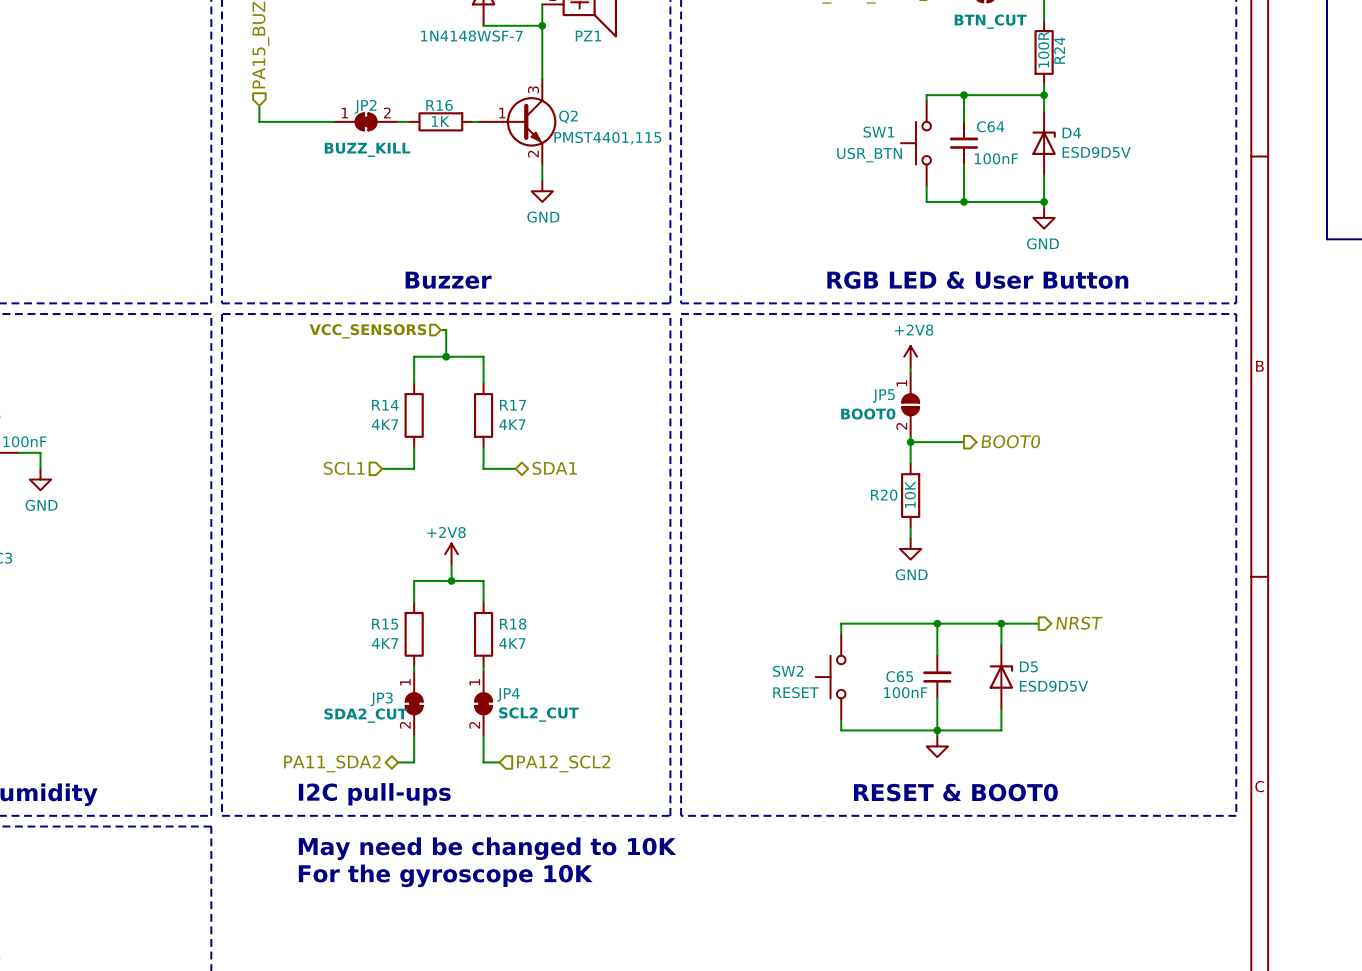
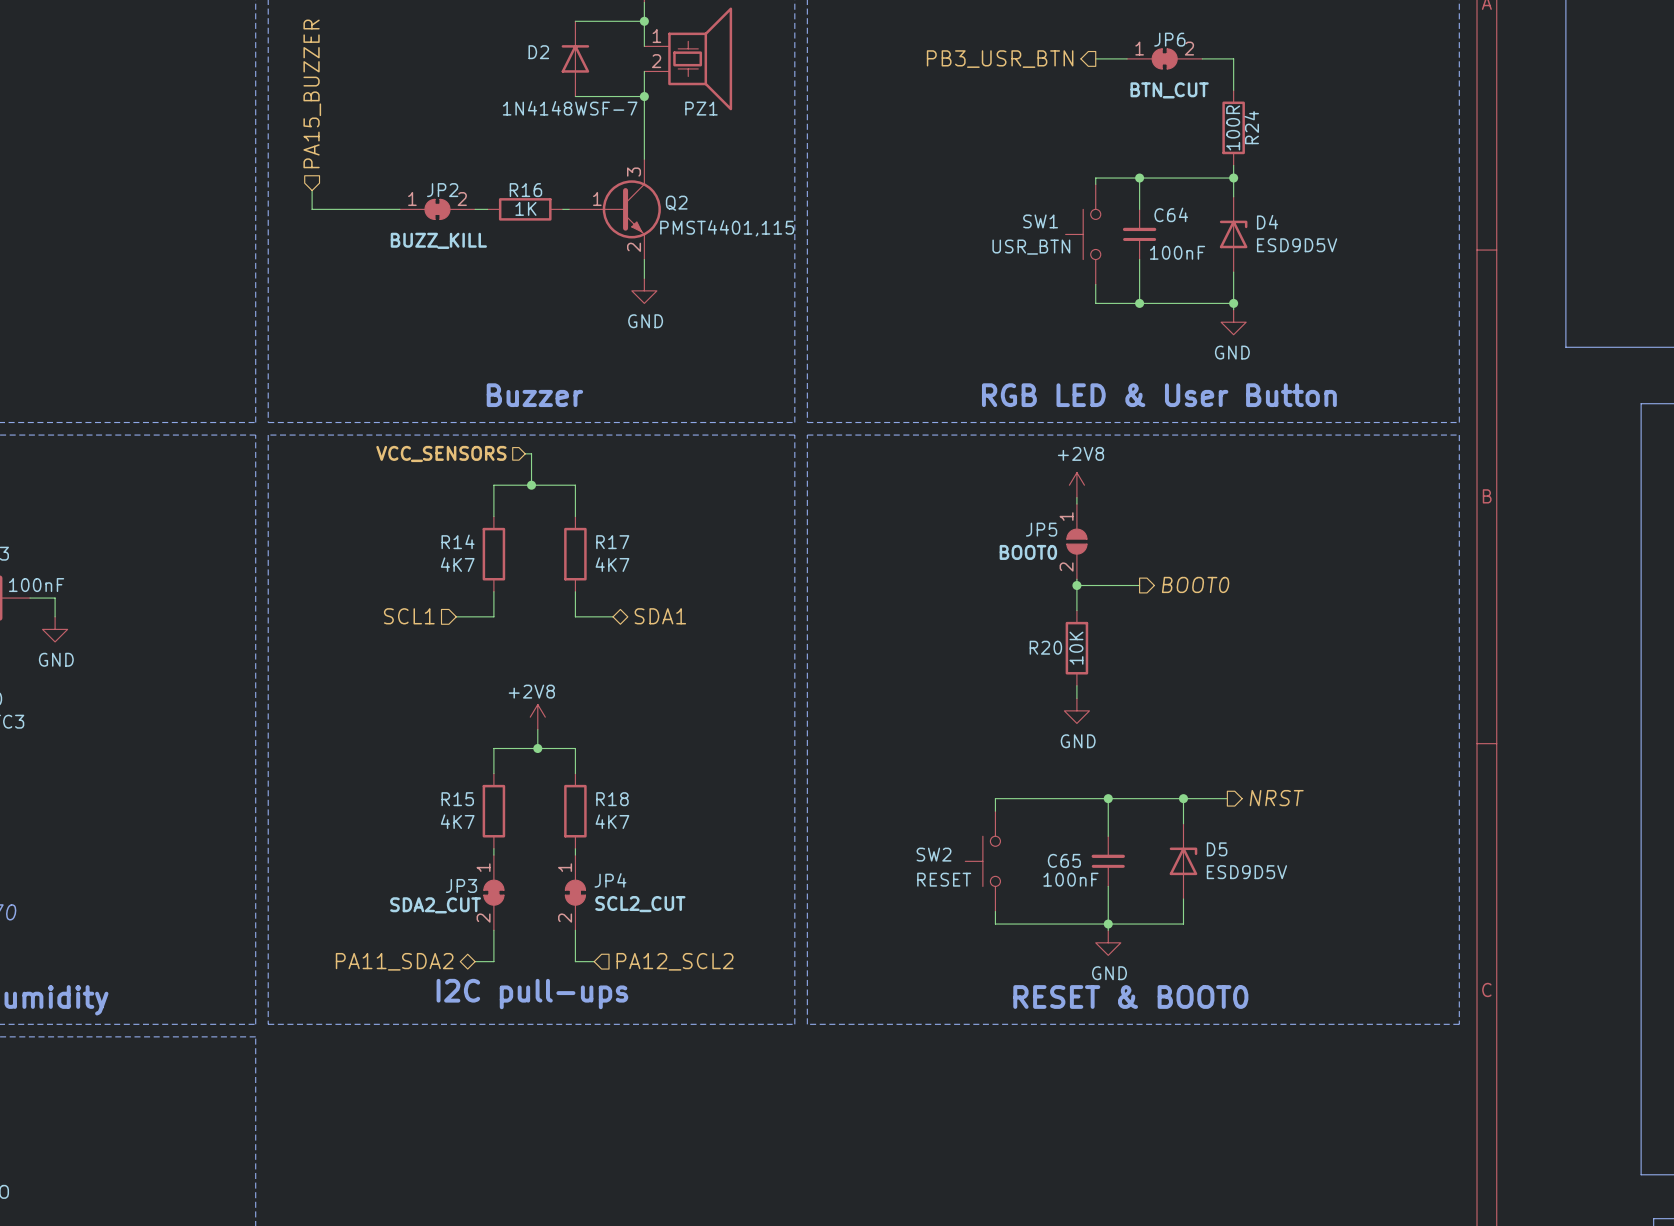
power symbol text: none -> GND (1109, 973)
text position: I2C pull-ups (374, 794) -> I2C pull-ups (532, 994)
text: May need be changed to 10K (487, 848) -> none
text: For the gyroscope 10K (445, 875) -> none

